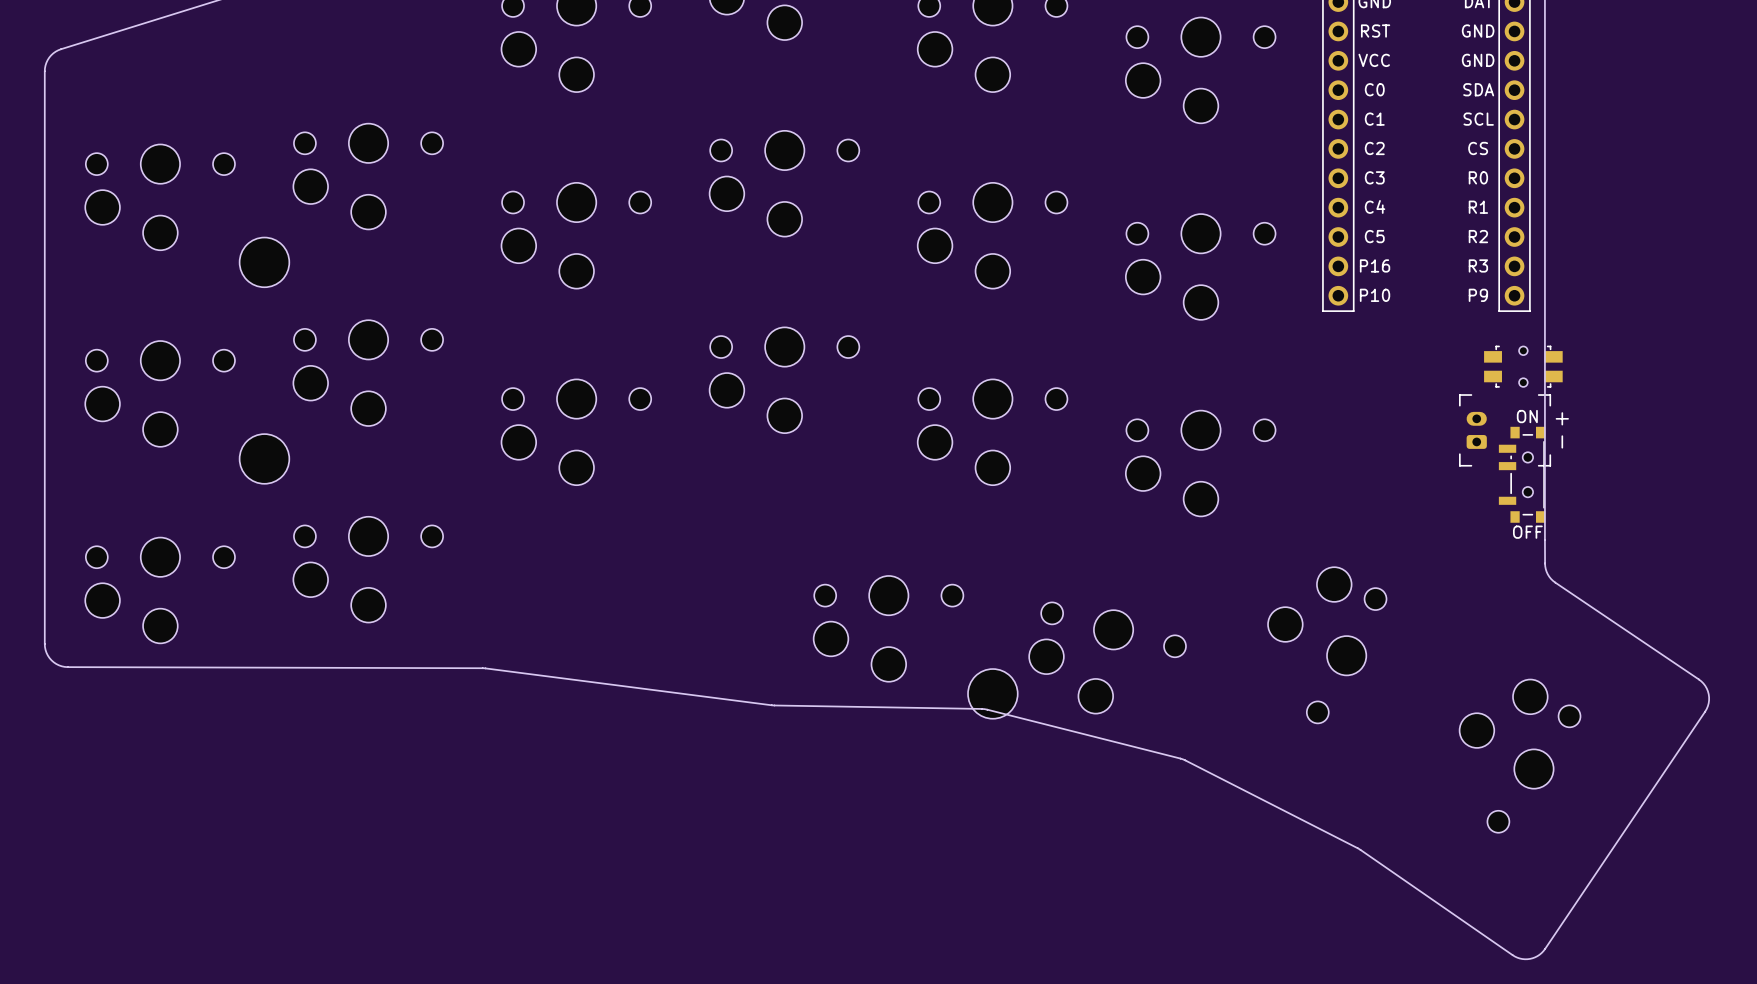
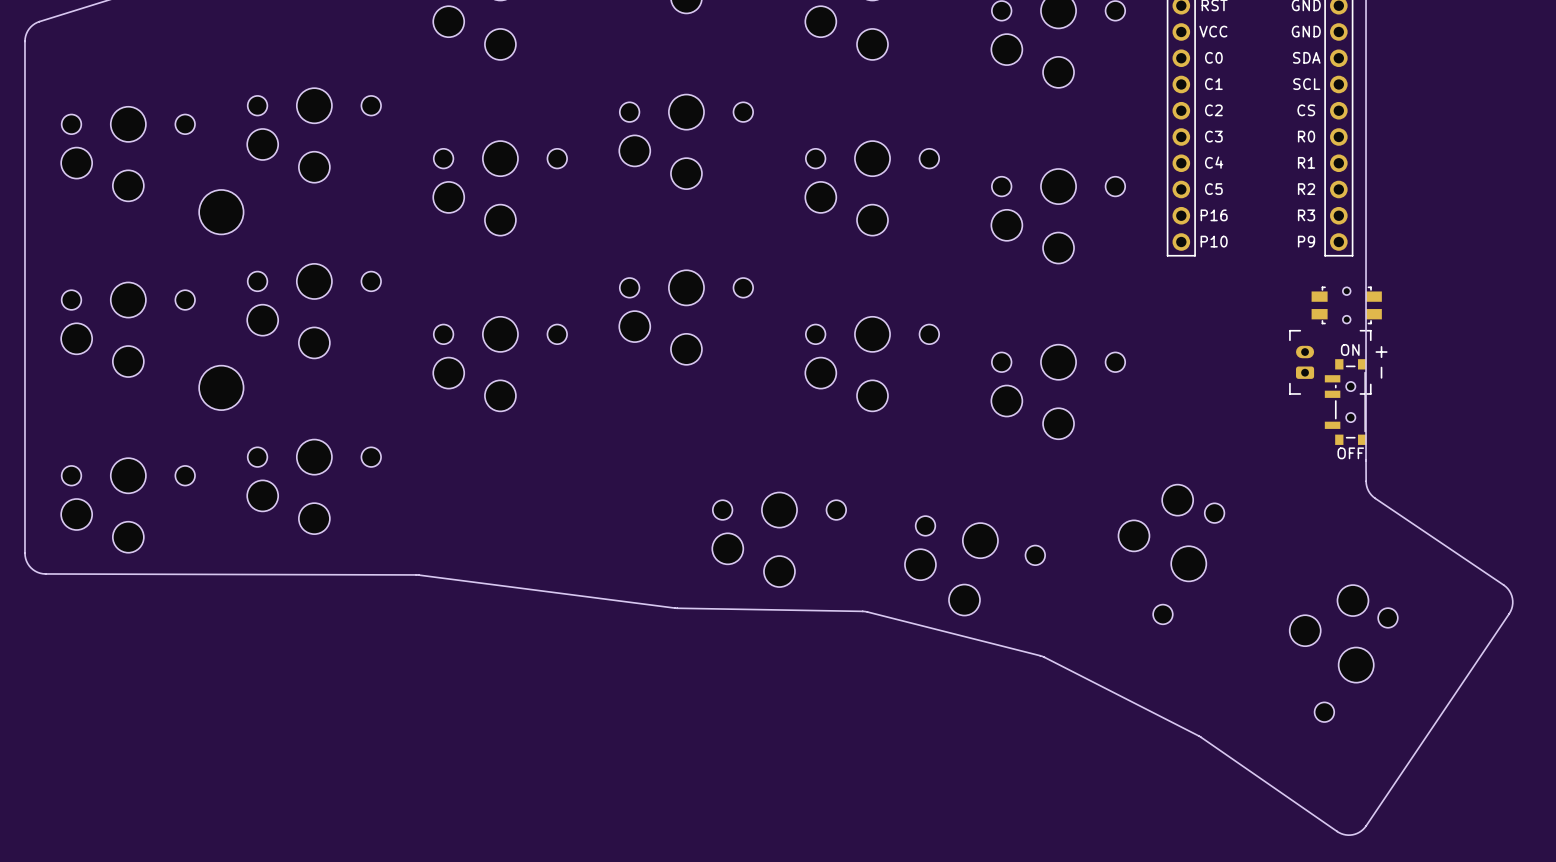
part: (992, 693) -> none

